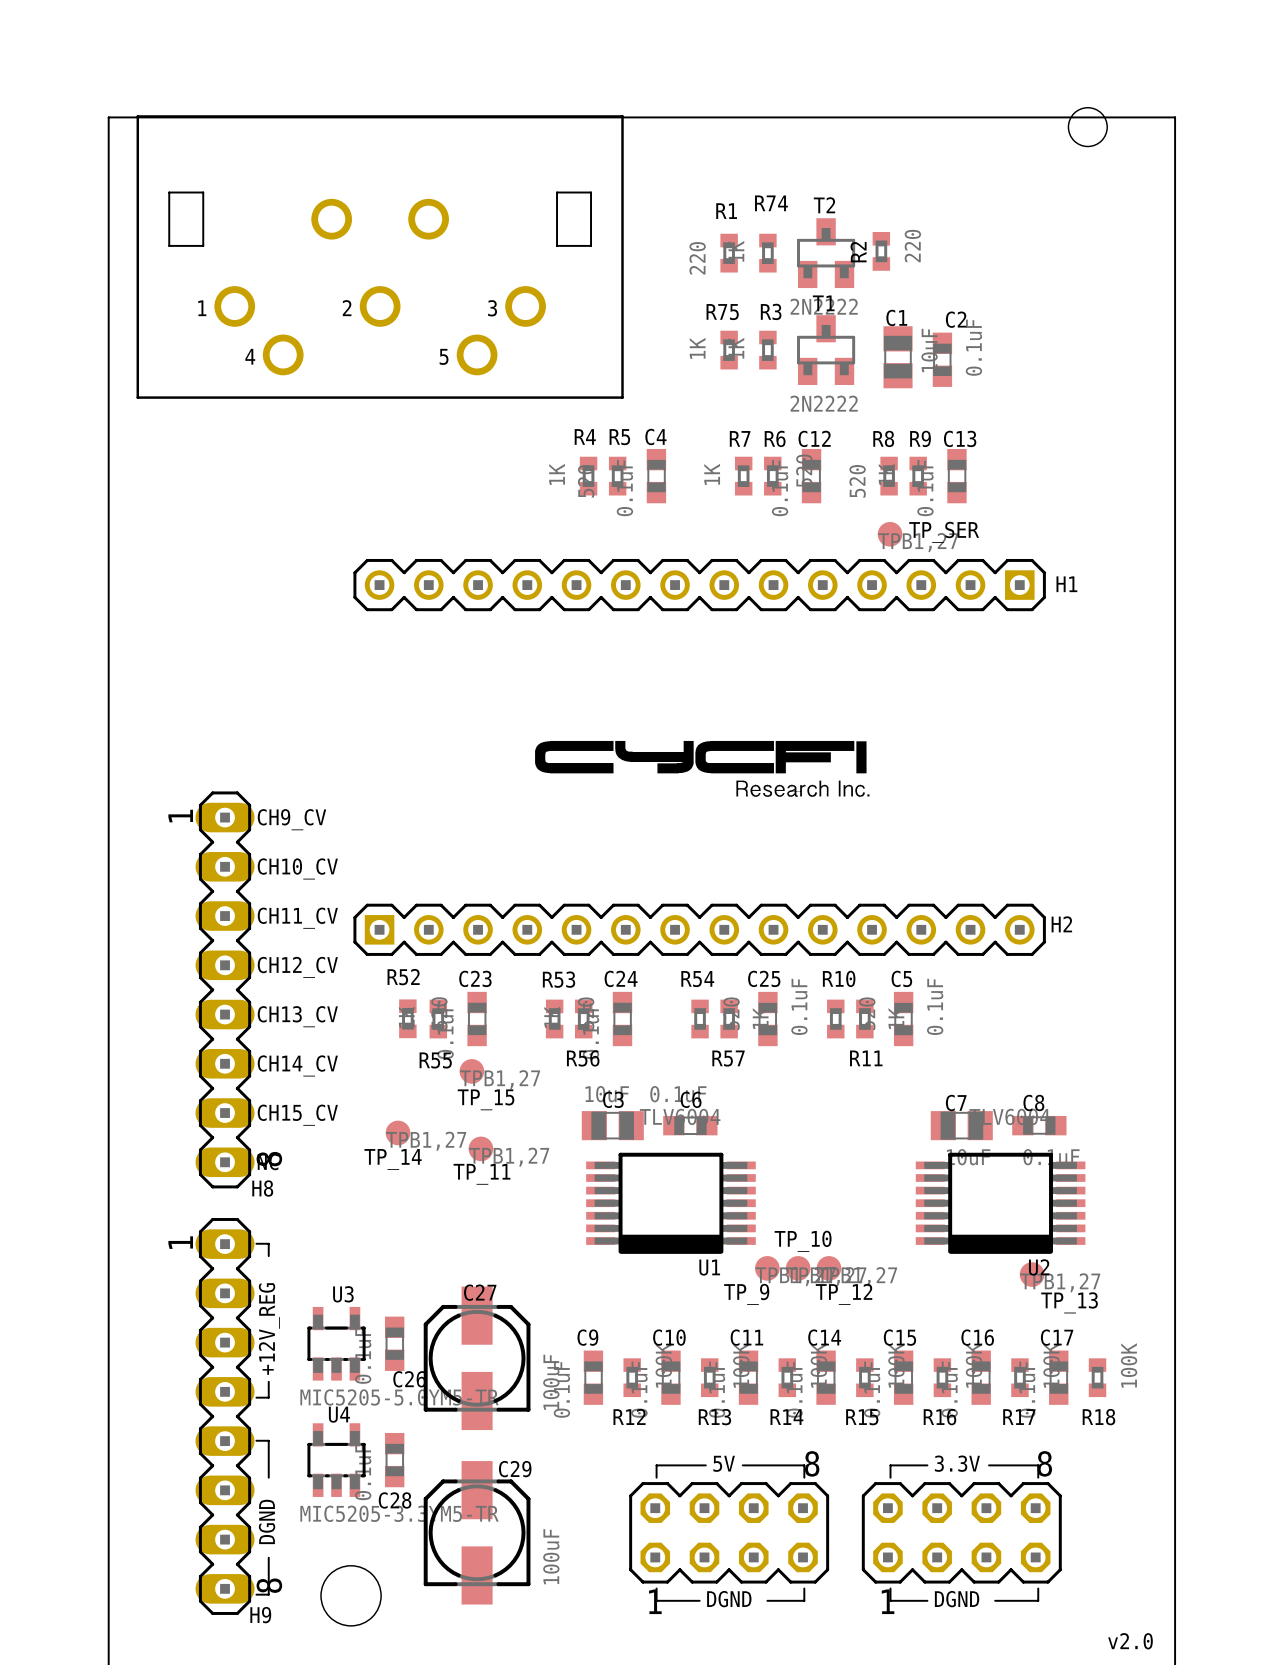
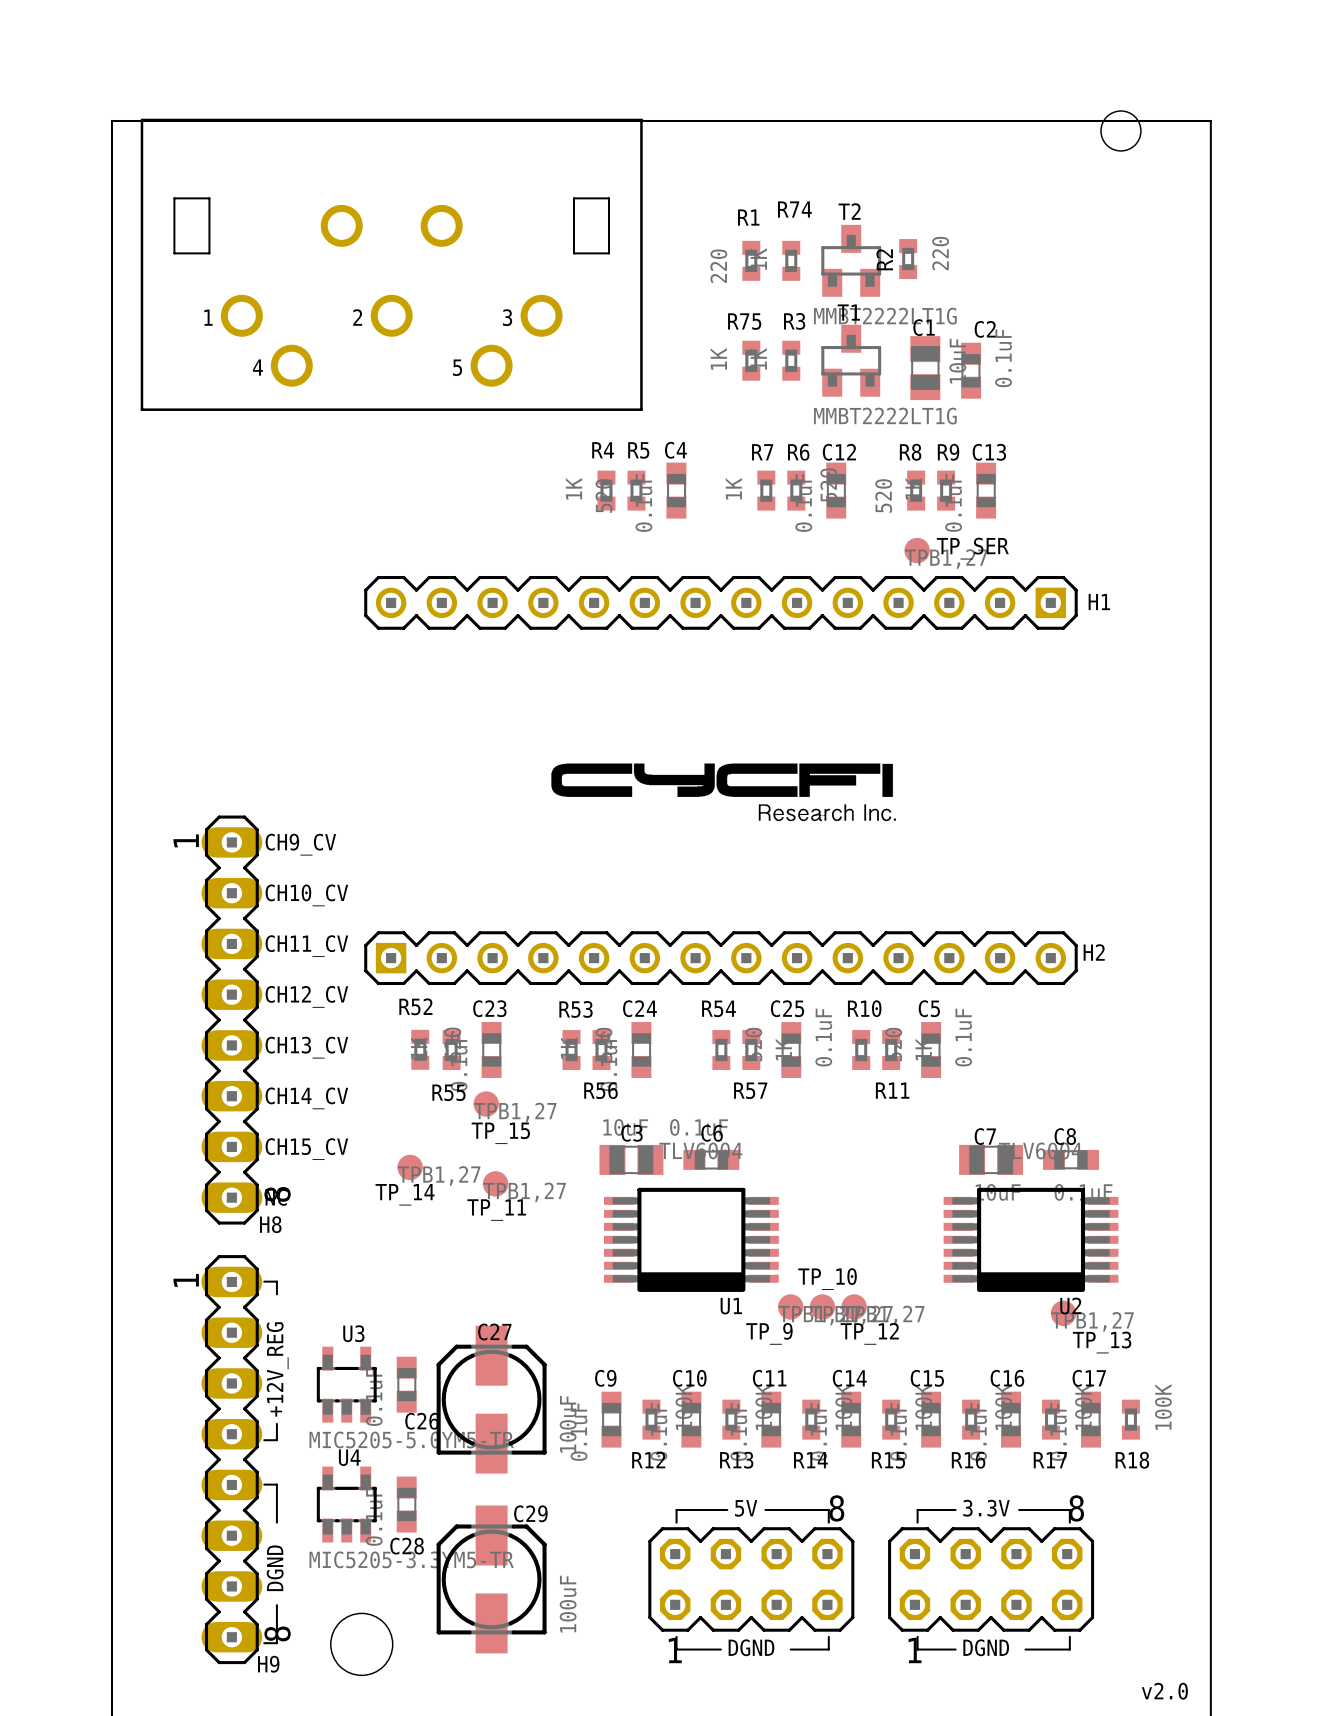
T2 value: 2N2222 (824, 306) -> MMBT2222LT1G (885, 316)
T1 value: 2N2222 (824, 403) -> MMBT2222LT1G (885, 416)

